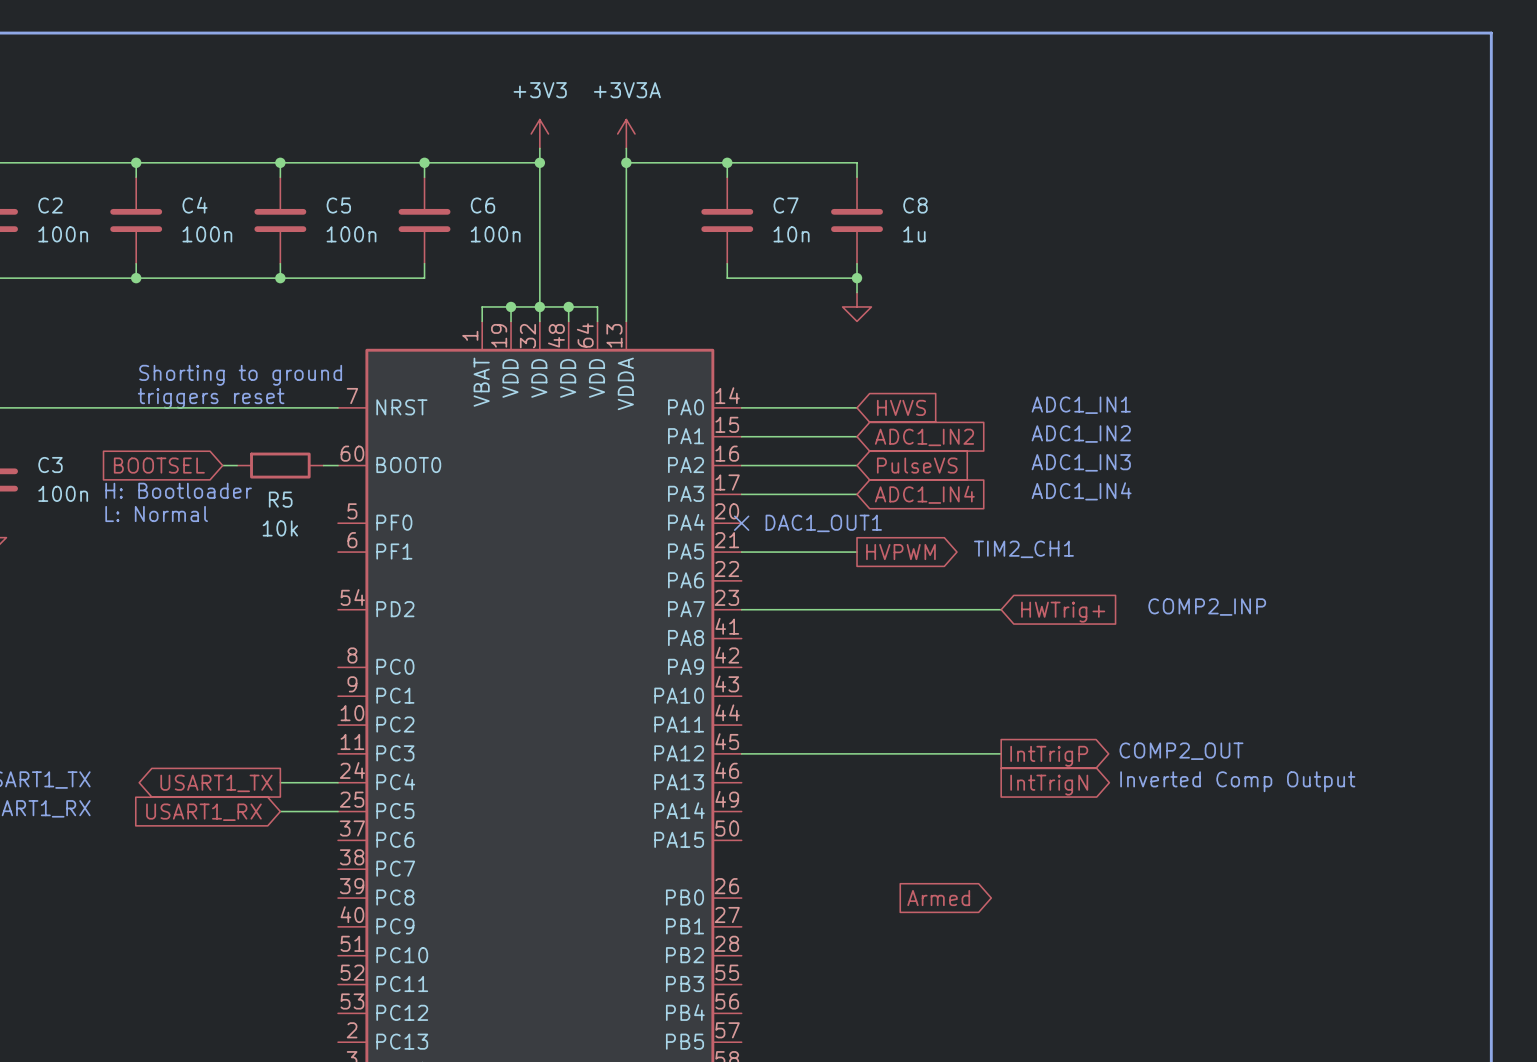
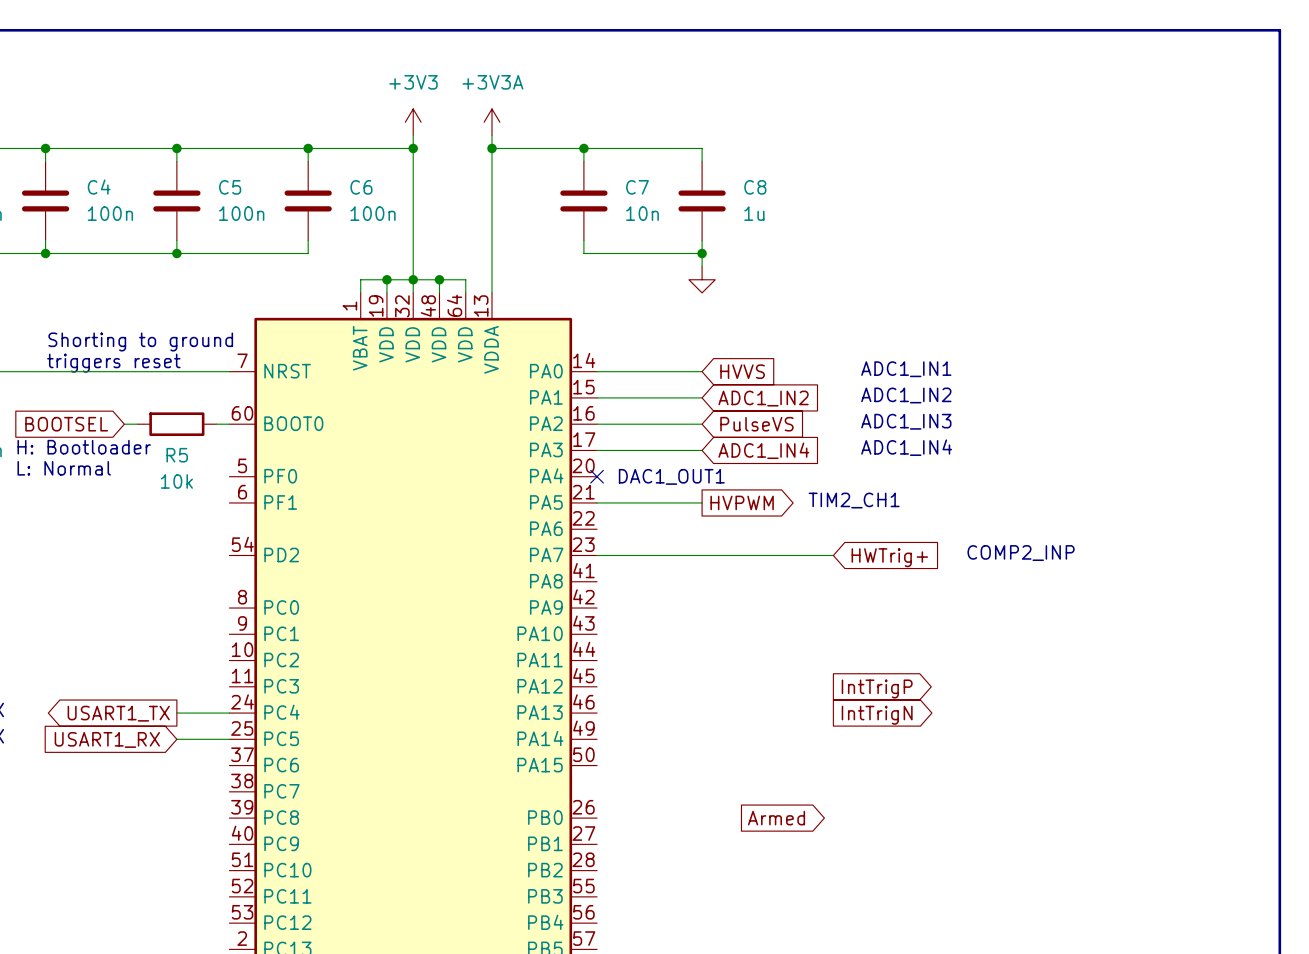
text: COMP2_OUT (1181, 751) -> none
wire: (741, 753) (1001, 753) -> none
text: Inverted Comp Output (1237, 781) -> none

